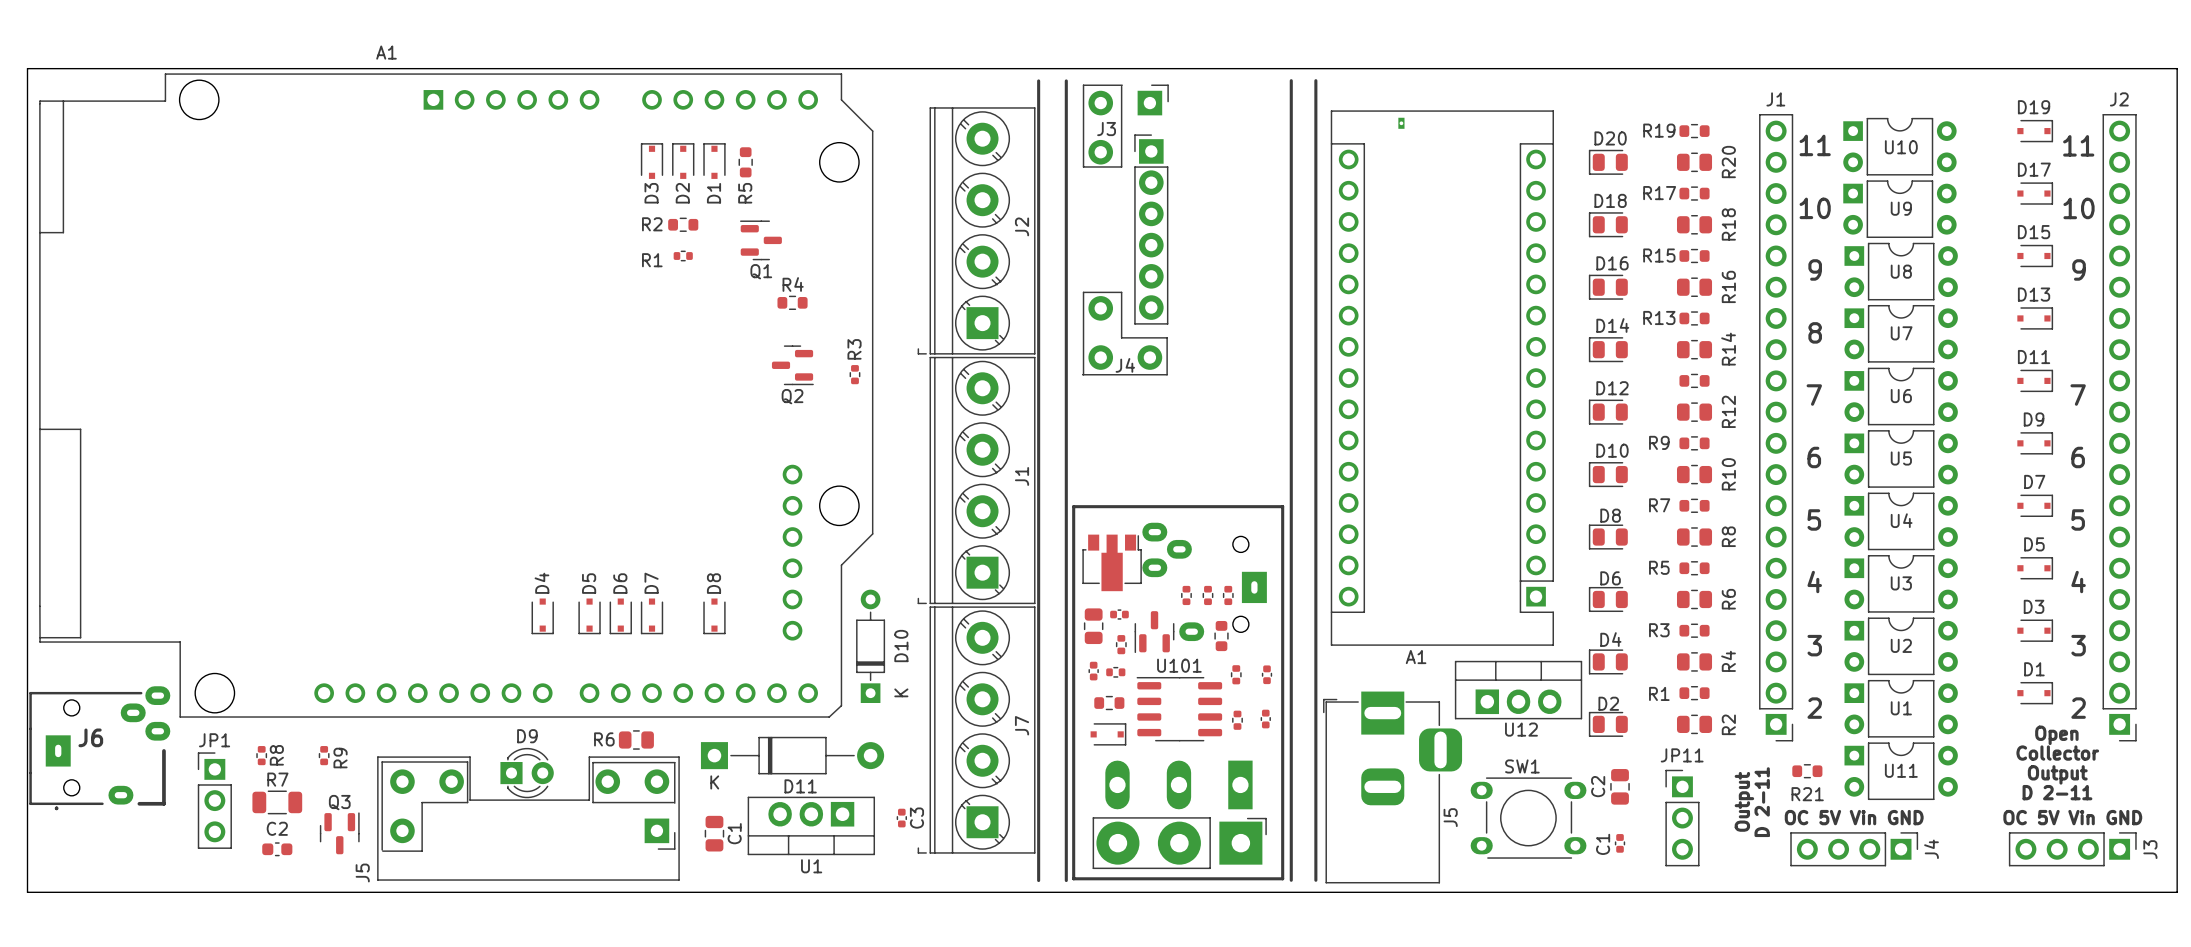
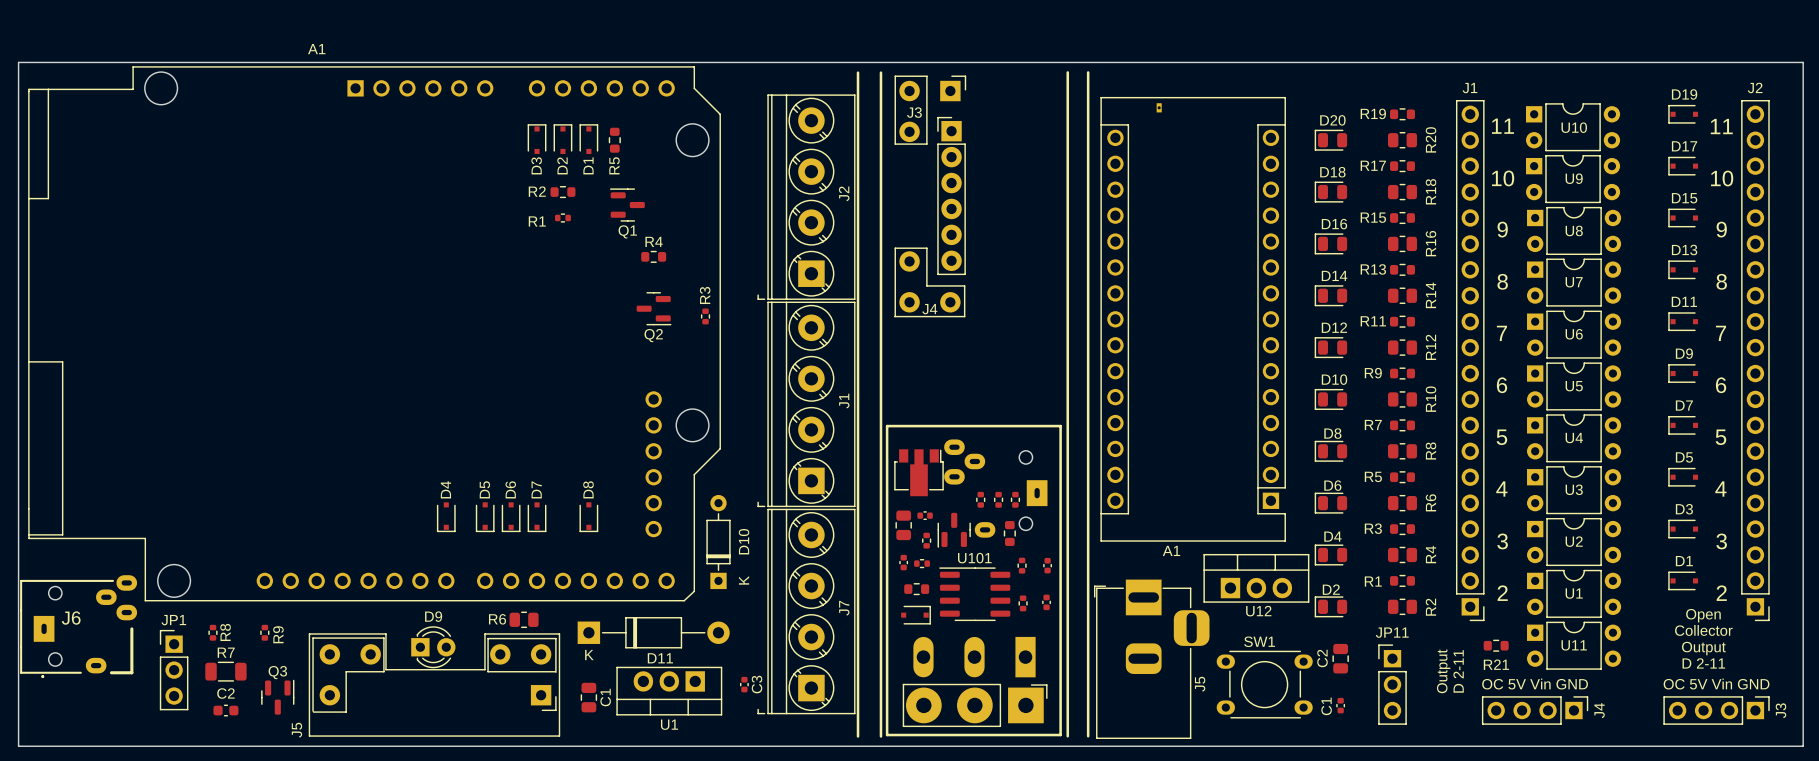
part footprint: [2017, 119, 2054, 143] -> [1668, 105, 1699, 124]
part footprint: [2017, 182, 2054, 205] -> [1668, 156, 1699, 176]
part footprint: [2017, 244, 2054, 268] -> [1668, 208, 1699, 228]
part footprint: [2017, 307, 2054, 330] -> [1668, 260, 1699, 280]
text: none -> 8 (1721, 281)
part footprint: [2017, 369, 2054, 393] -> [1668, 312, 1699, 331]
part text: none -> R11 (1373, 321)
part footprint: [2017, 432, 2054, 455] -> [1668, 364, 1699, 383]
part footprint: [2017, 494, 2054, 517] -> [1668, 416, 1699, 435]
part footprint: [2017, 557, 2054, 580] -> [1668, 467, 1699, 487]
part footprint: [2017, 619, 2054, 642] -> [1668, 519, 1699, 539]
part footprint: [2017, 681, 2054, 705] -> [1668, 571, 1699, 591]

